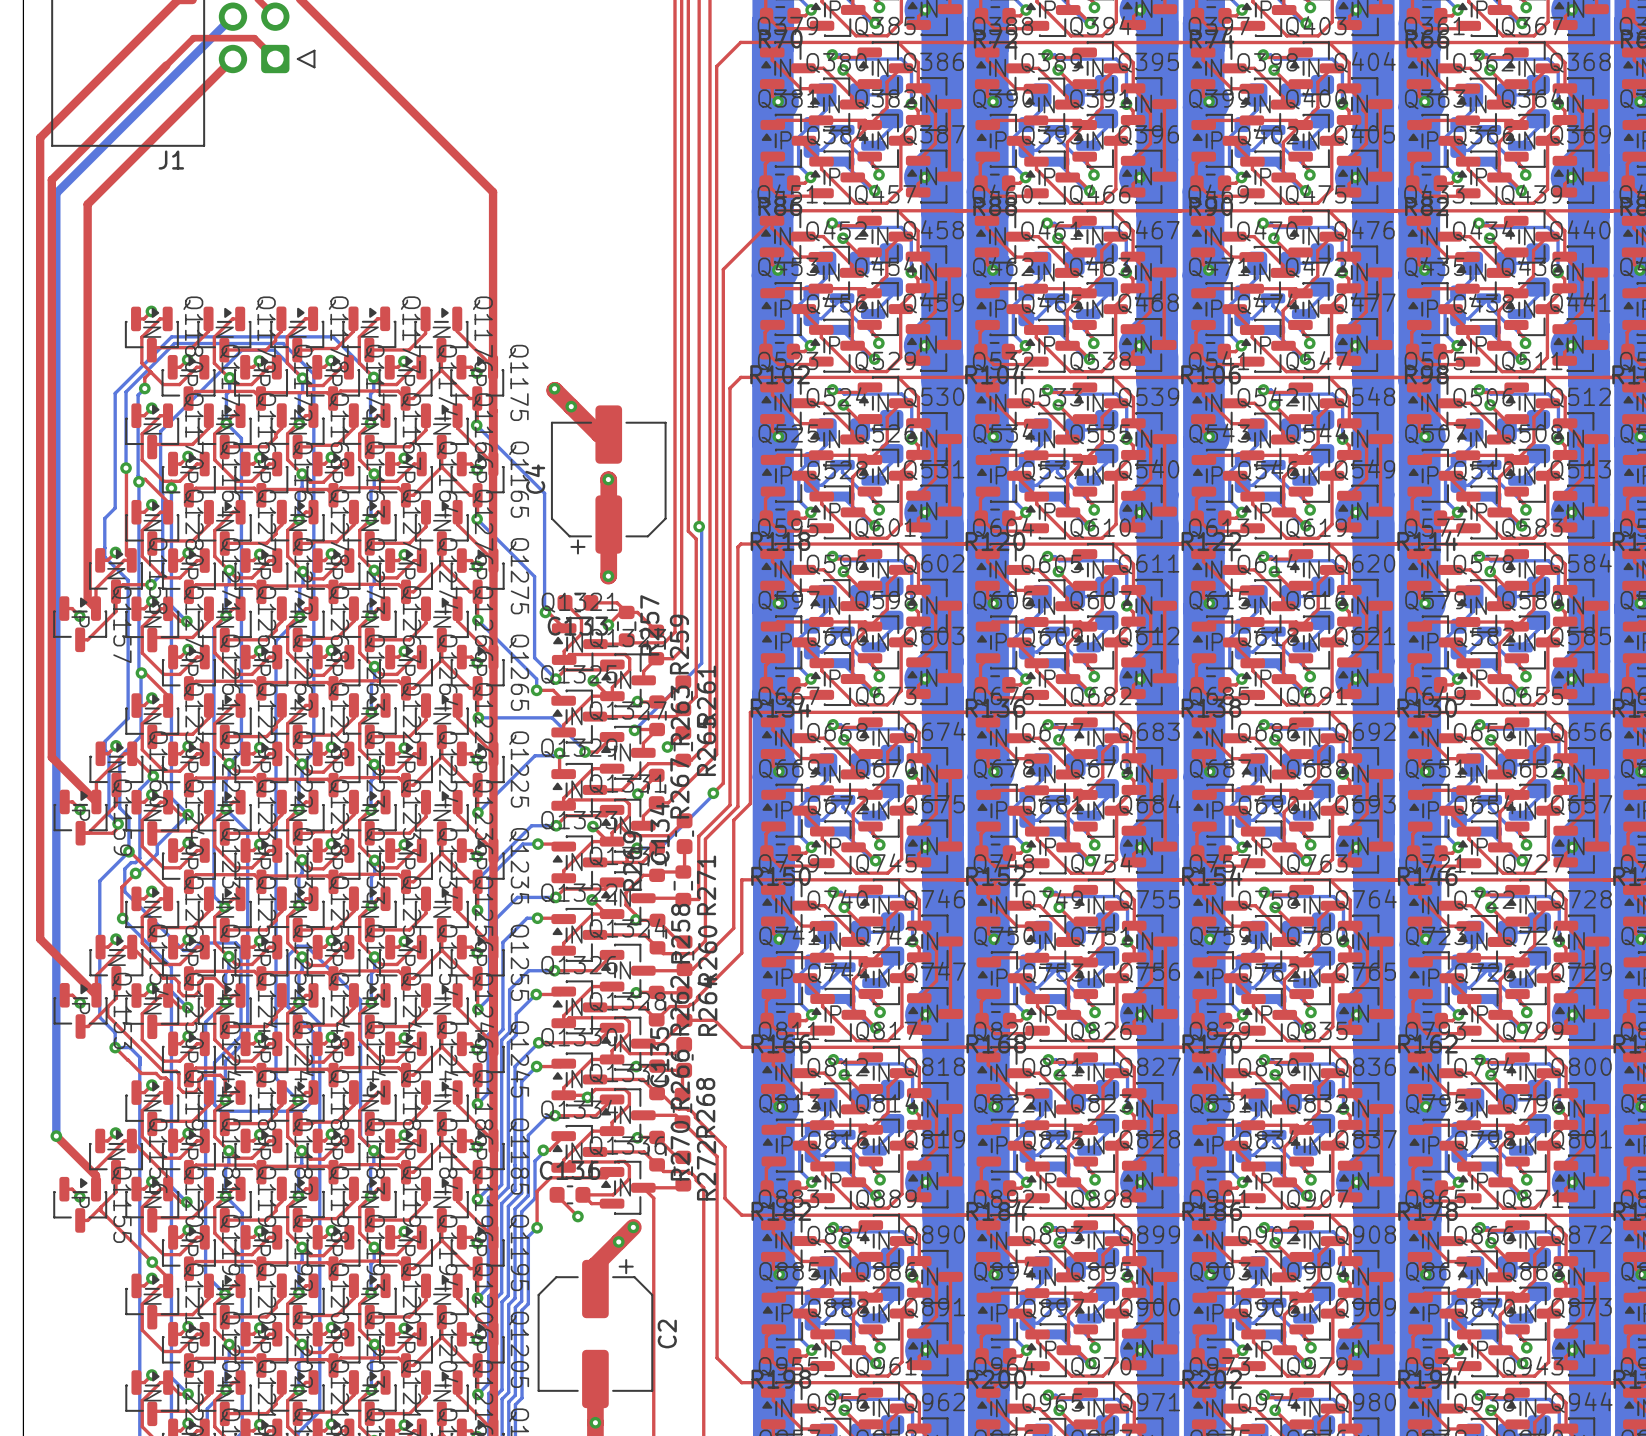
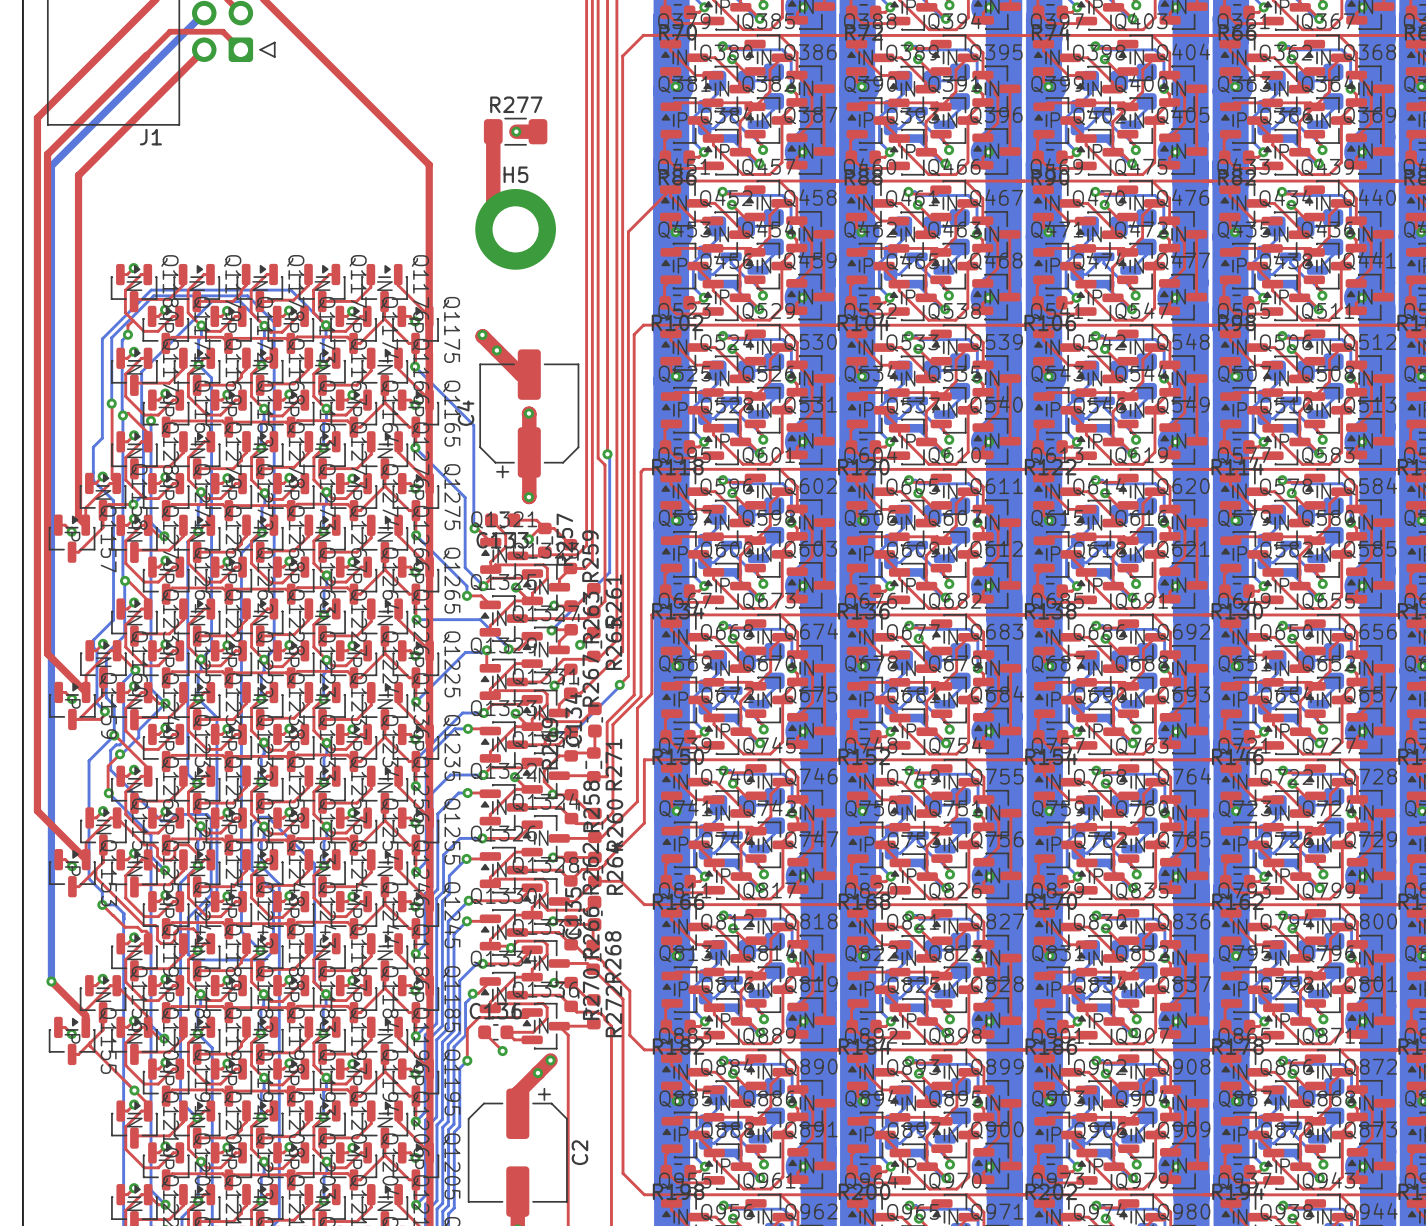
top track: none -> (493, 131) (493, 207) (515, 229)
R277: none -> (515, 131)
top track: none -> (516, 131) (537, 131)
via: none -> (516, 131)
H5: none -> (515, 229)

